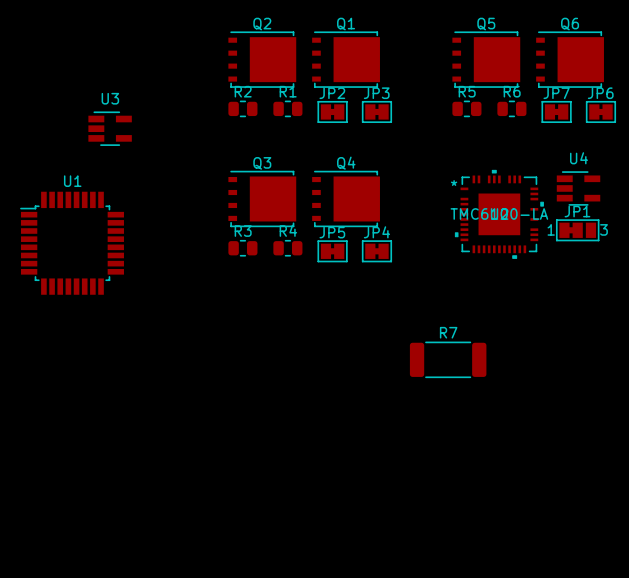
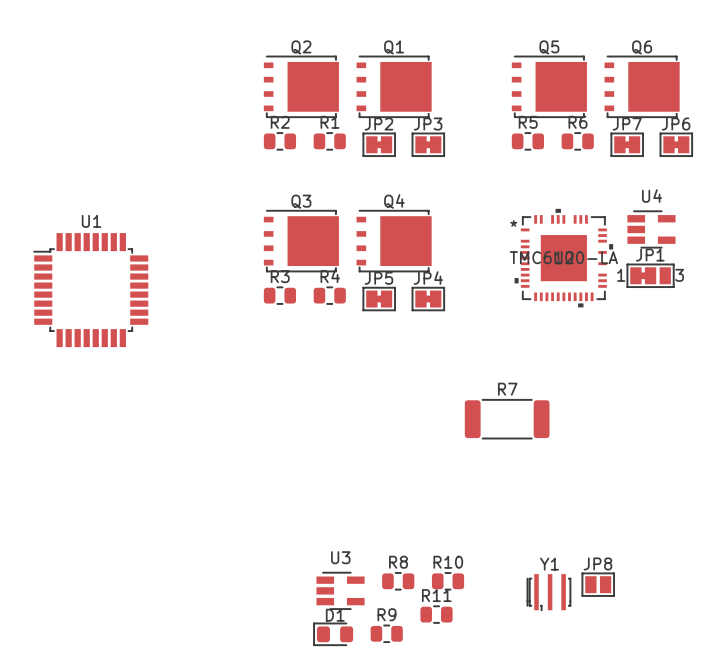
U3 position: (110, 128) -> (340, 590)
R8: none -> (398, 581)
R10: none -> (448, 581)
JP8: none -> (598, 584)
Y1: none -> (548, 592)
R11: none -> (436, 614)
R9: none -> (386, 633)
D1: none -> (333, 634)

